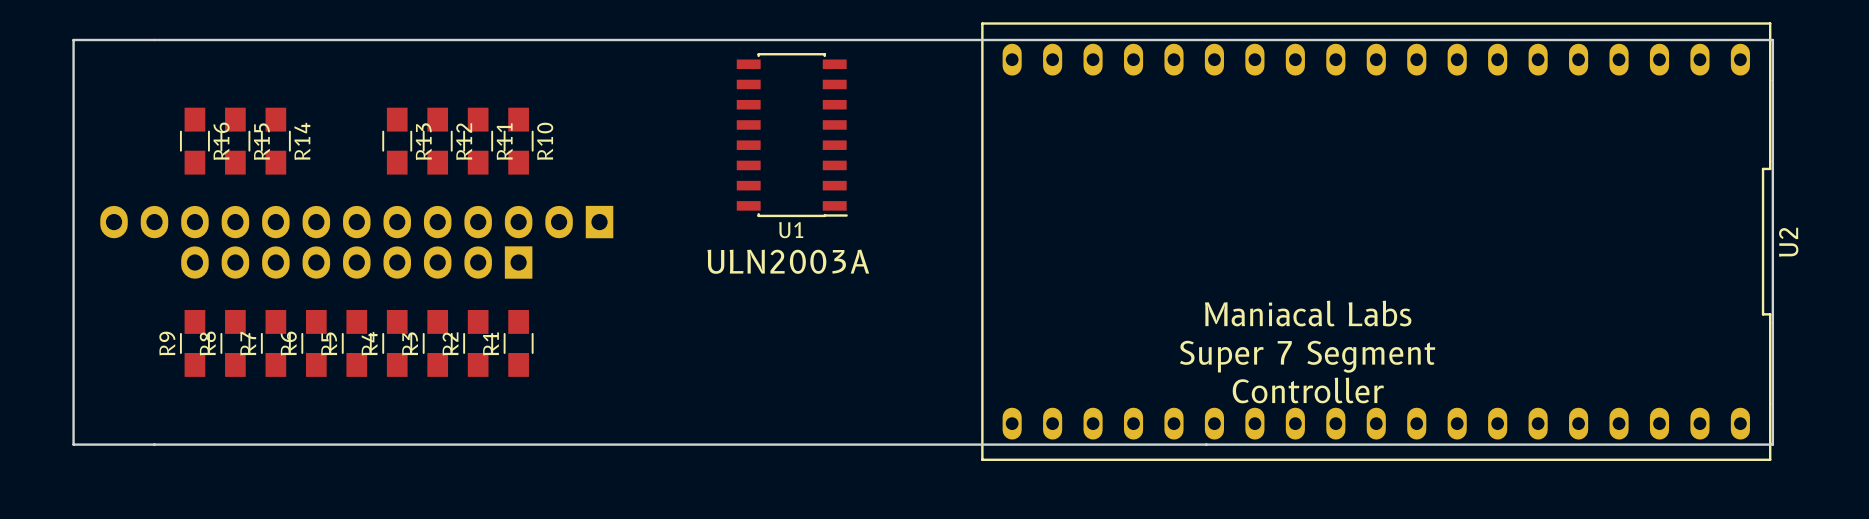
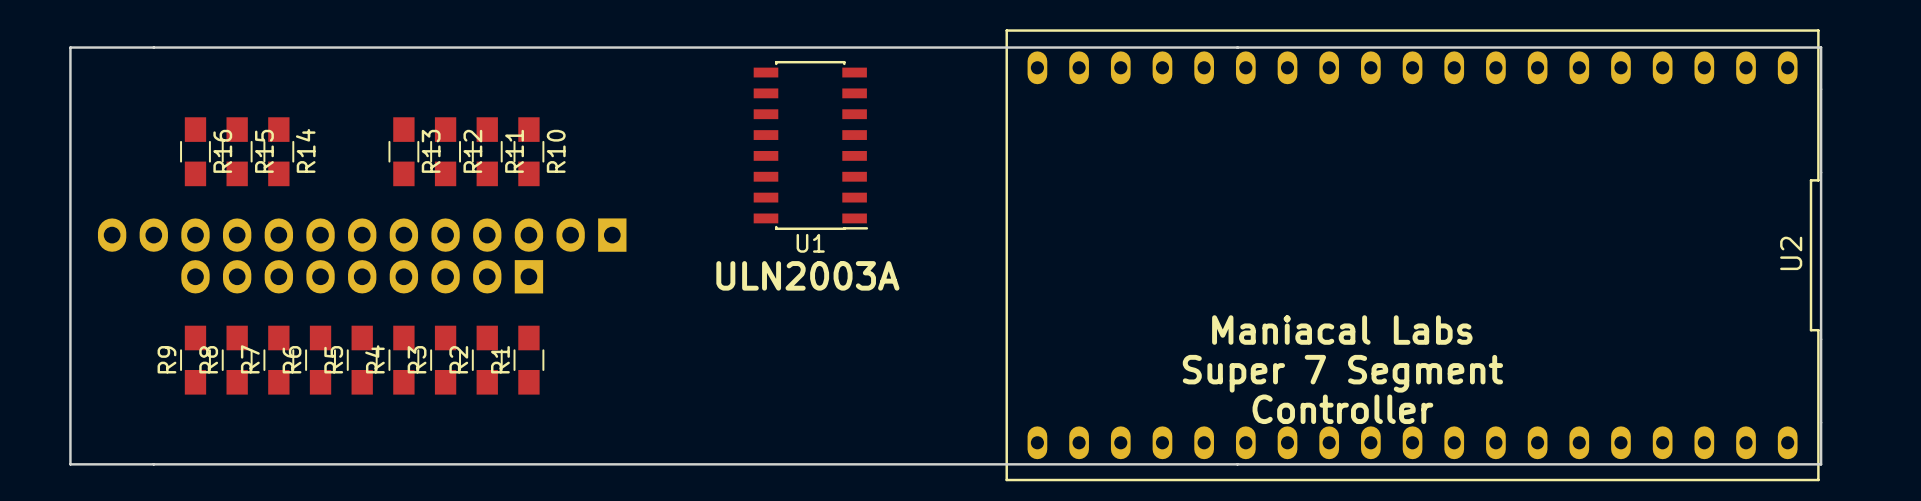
U2 name position: U2 (1788, 242) -> U2 (1791, 253)

